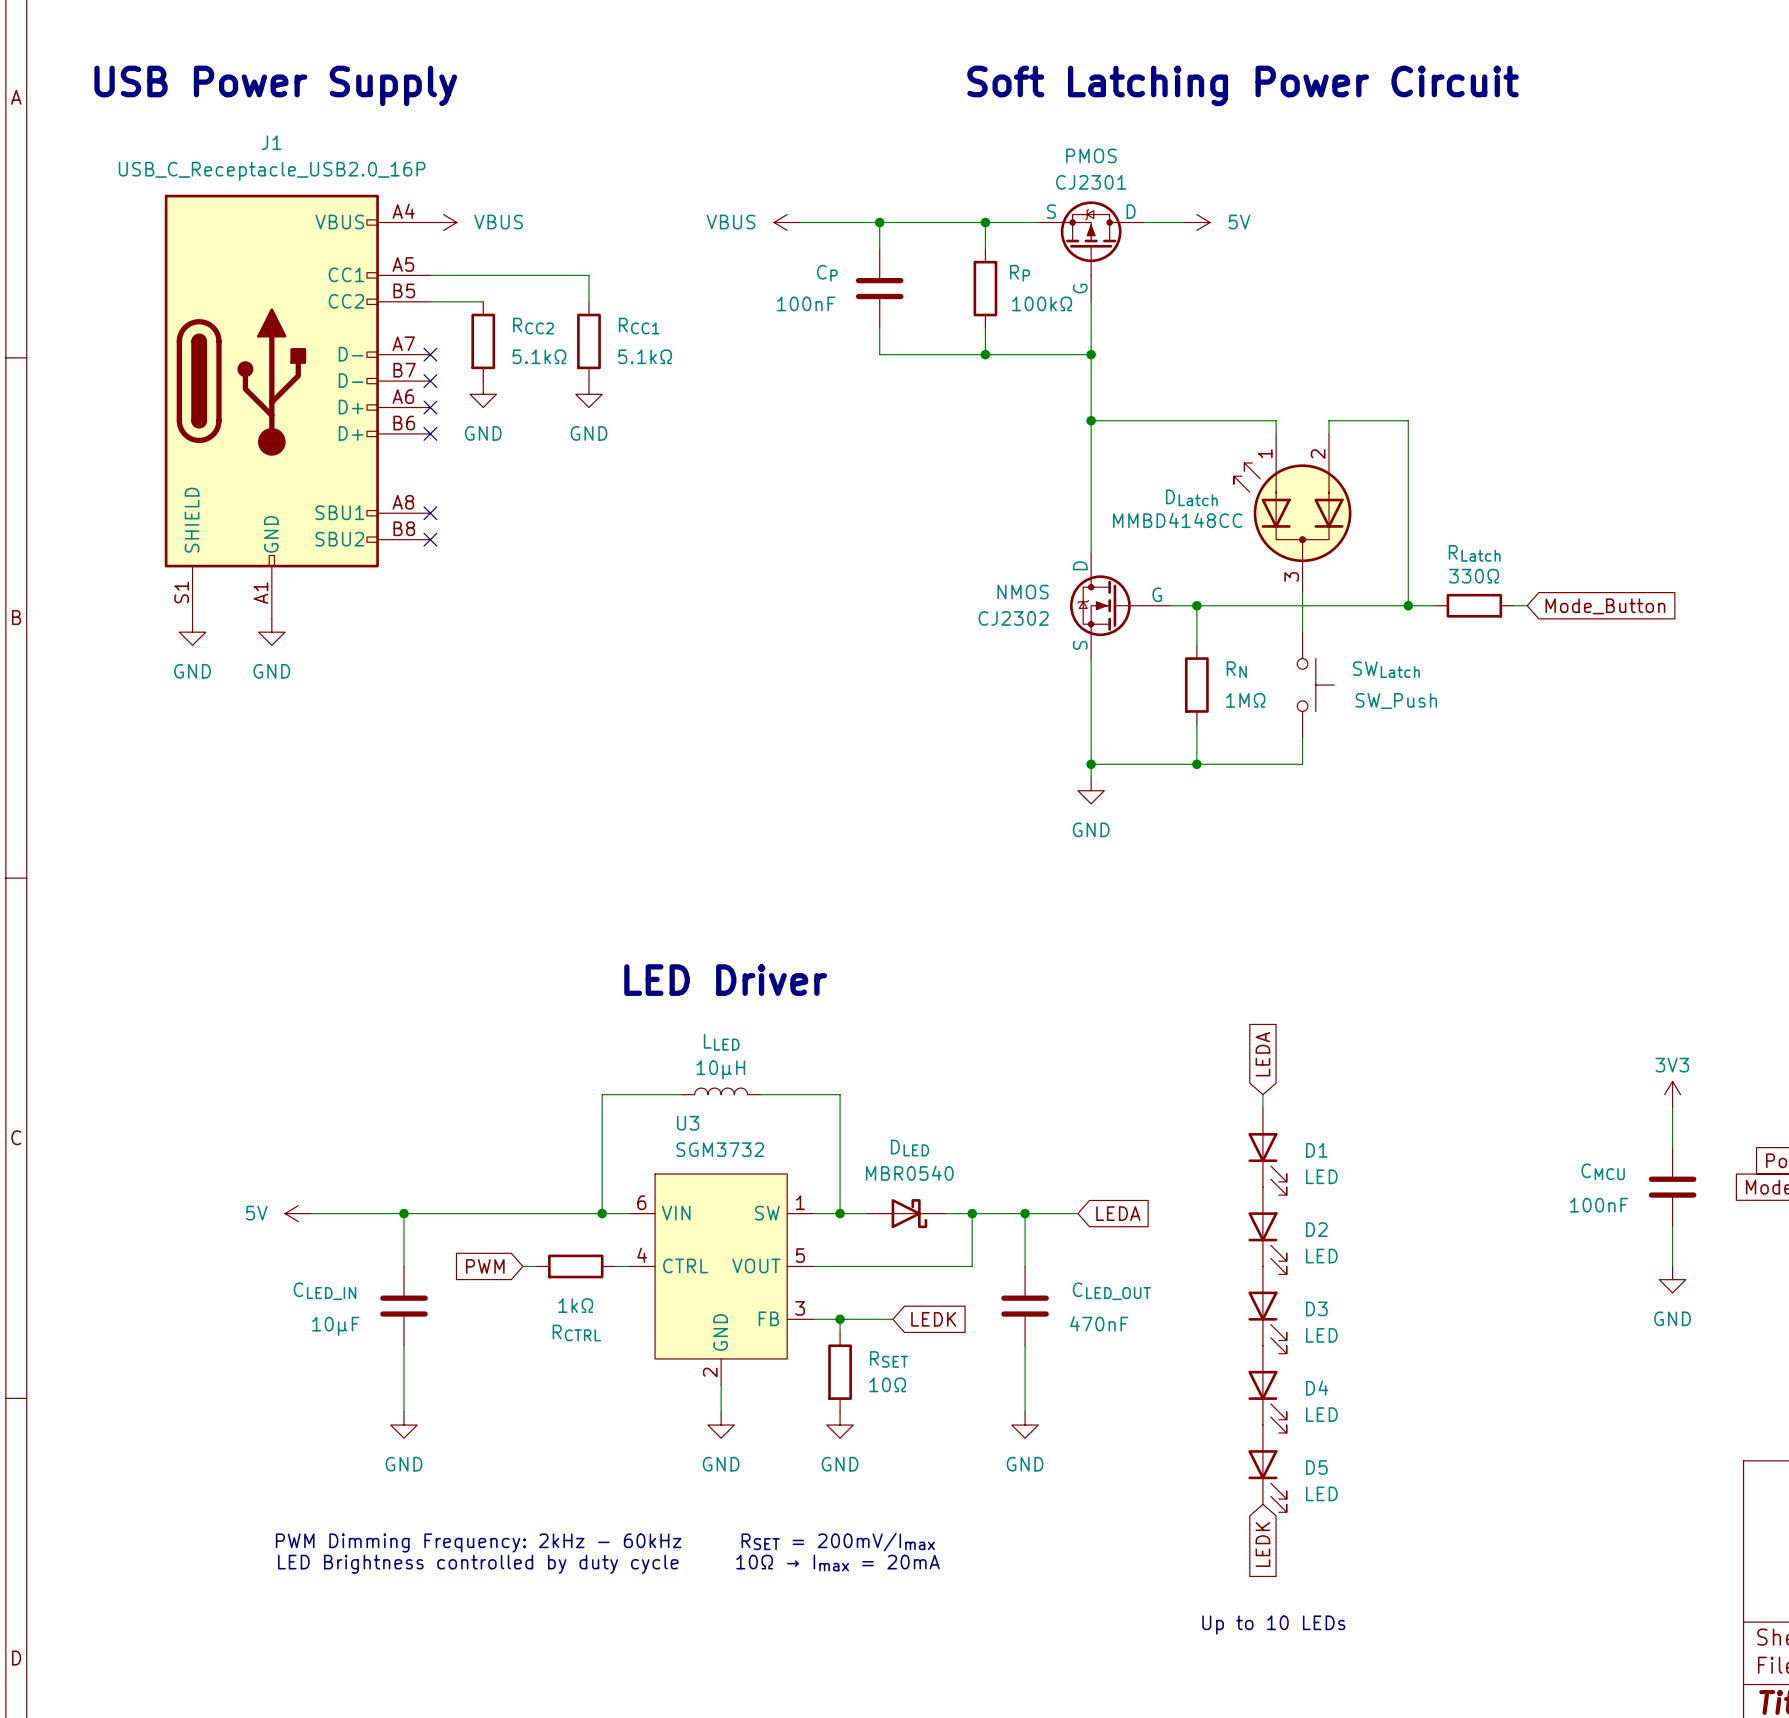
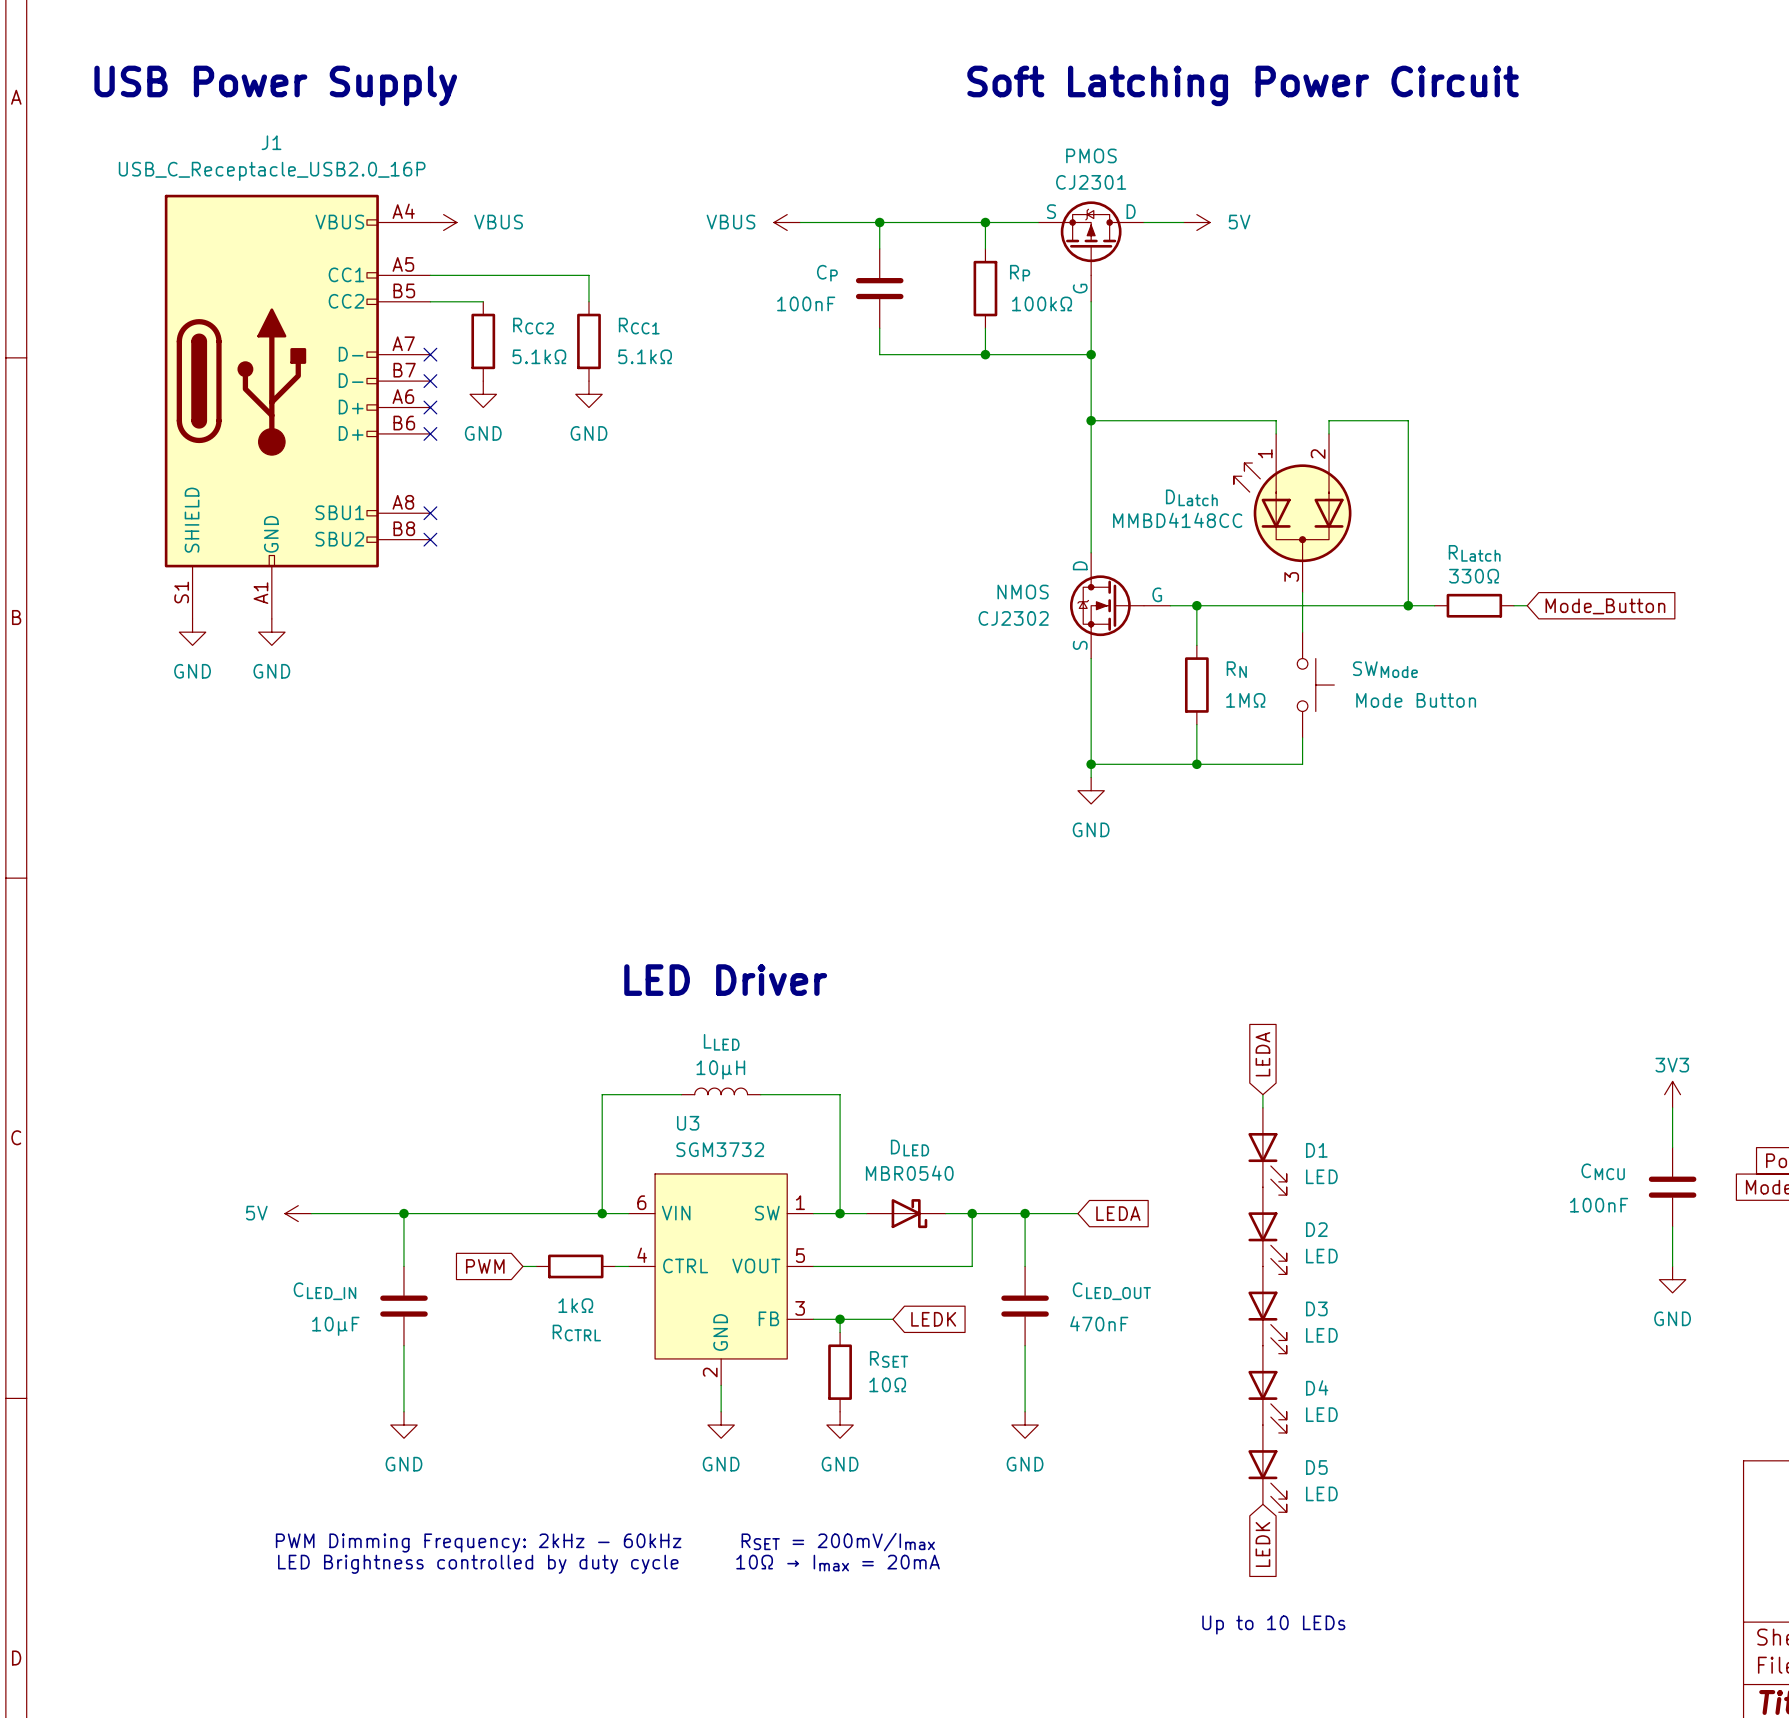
SWLatch name: SWLatch (1386, 669) -> SWMode (1385, 669)
SWLatch value: SW_Push (1396, 701) -> Mode Button (1416, 700)

